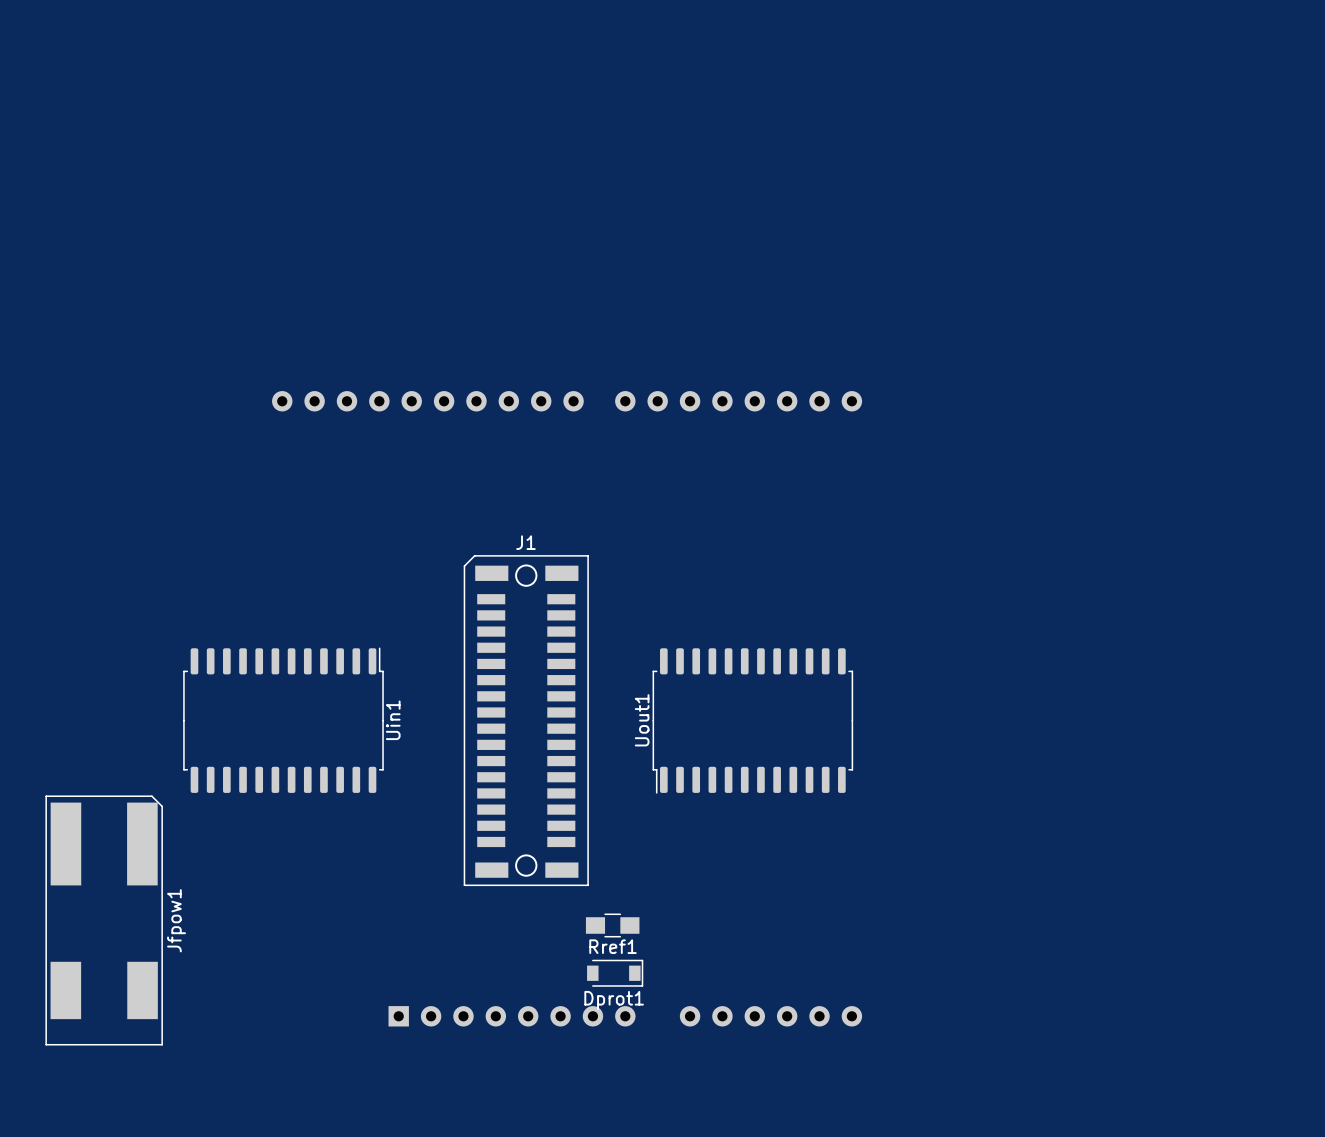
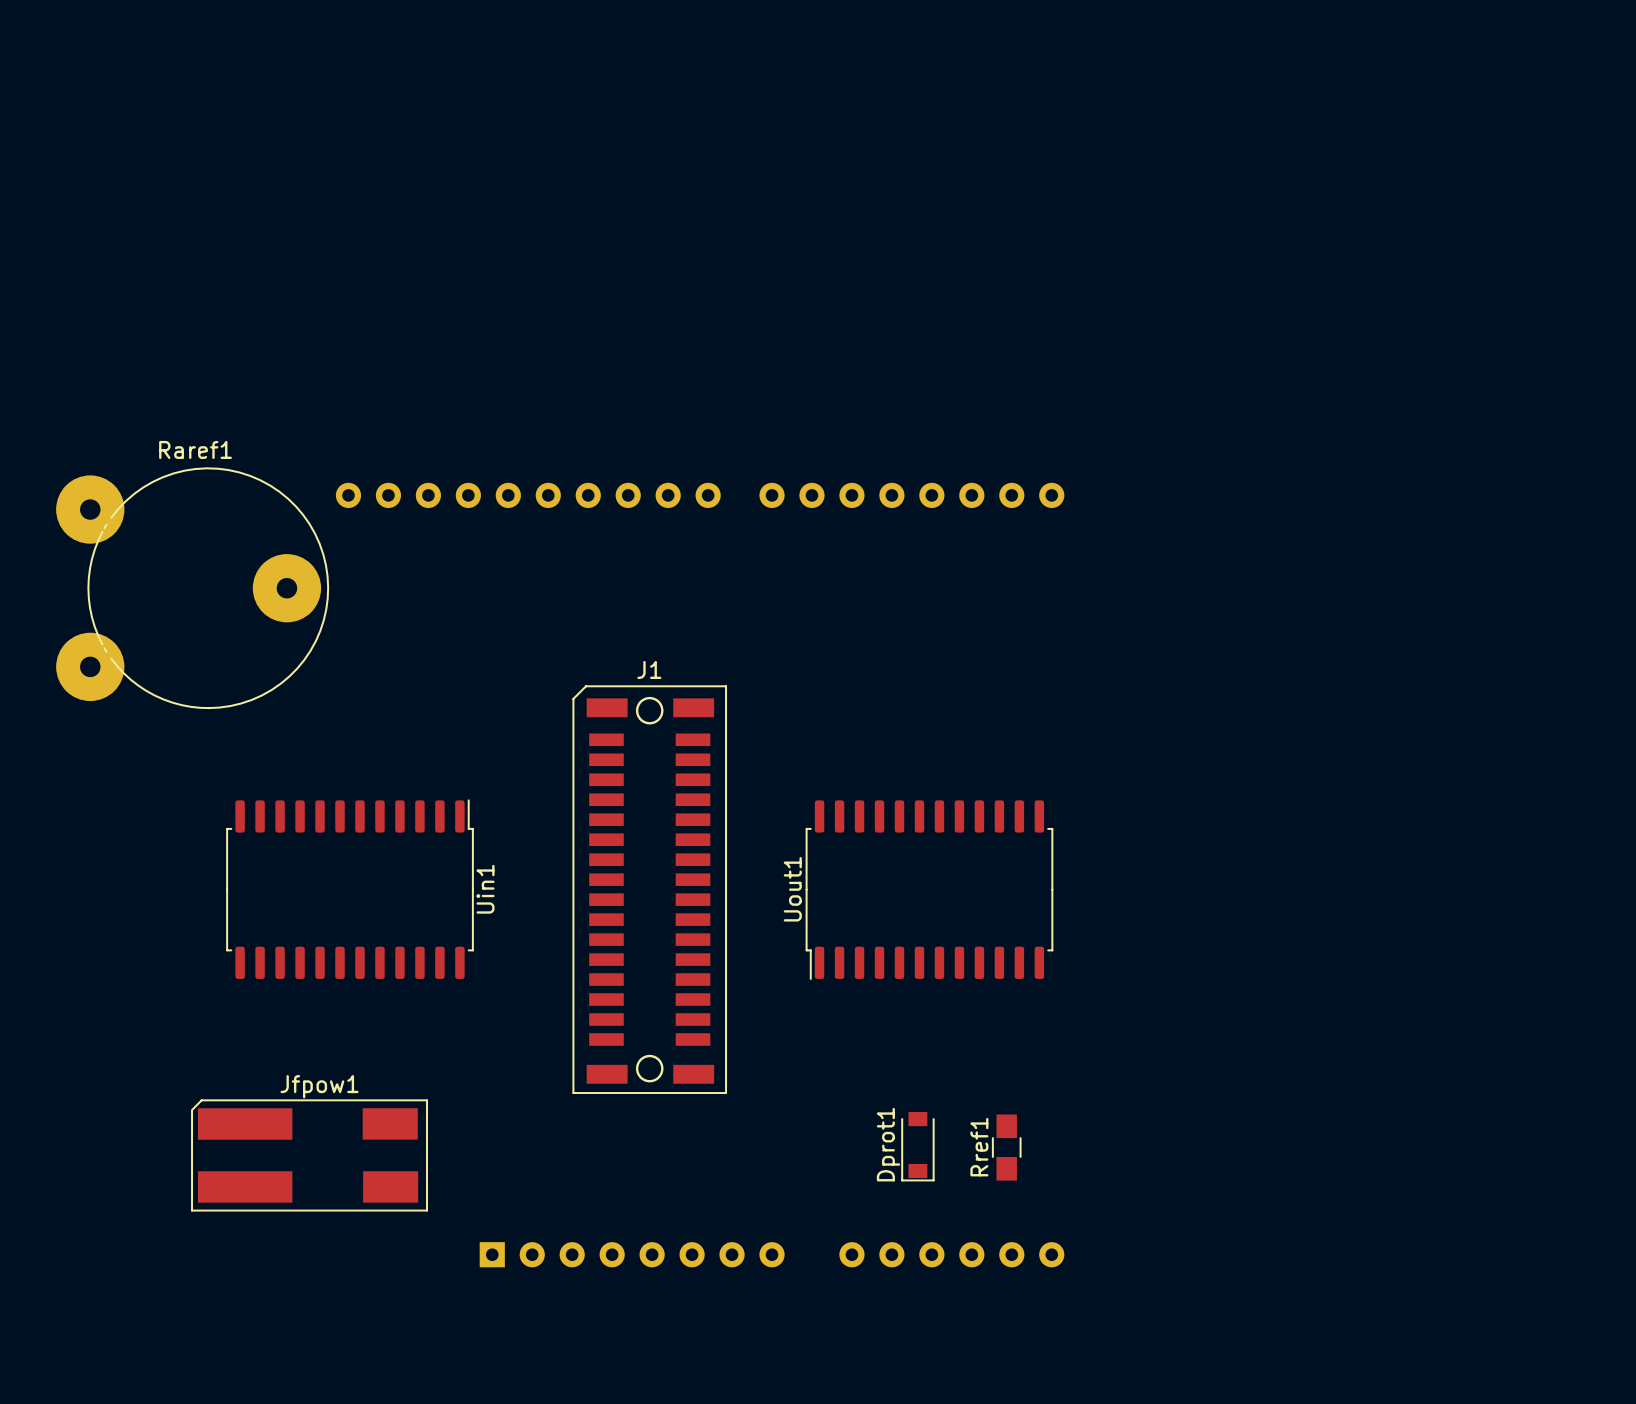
Raref1: none -> (192, 588)
Jfpow1 footprint: [45, 795, 163, 1046] -> [191, 1099, 428, 1212]
Jfpow1 name position: Jfpow1 (176, 920) -> Jfpow1 (319, 1086)
Rref1 rotation: 0° (612, 925) -> 90° clockwise (1006, 1147)
Rref1 position: (612, 925) -> (1006, 1147)
Dprot1 rotation: 0° (615, 973) -> 90° clockwise (917, 1146)
Dprot1 position: (615, 973) -> (917, 1146)

